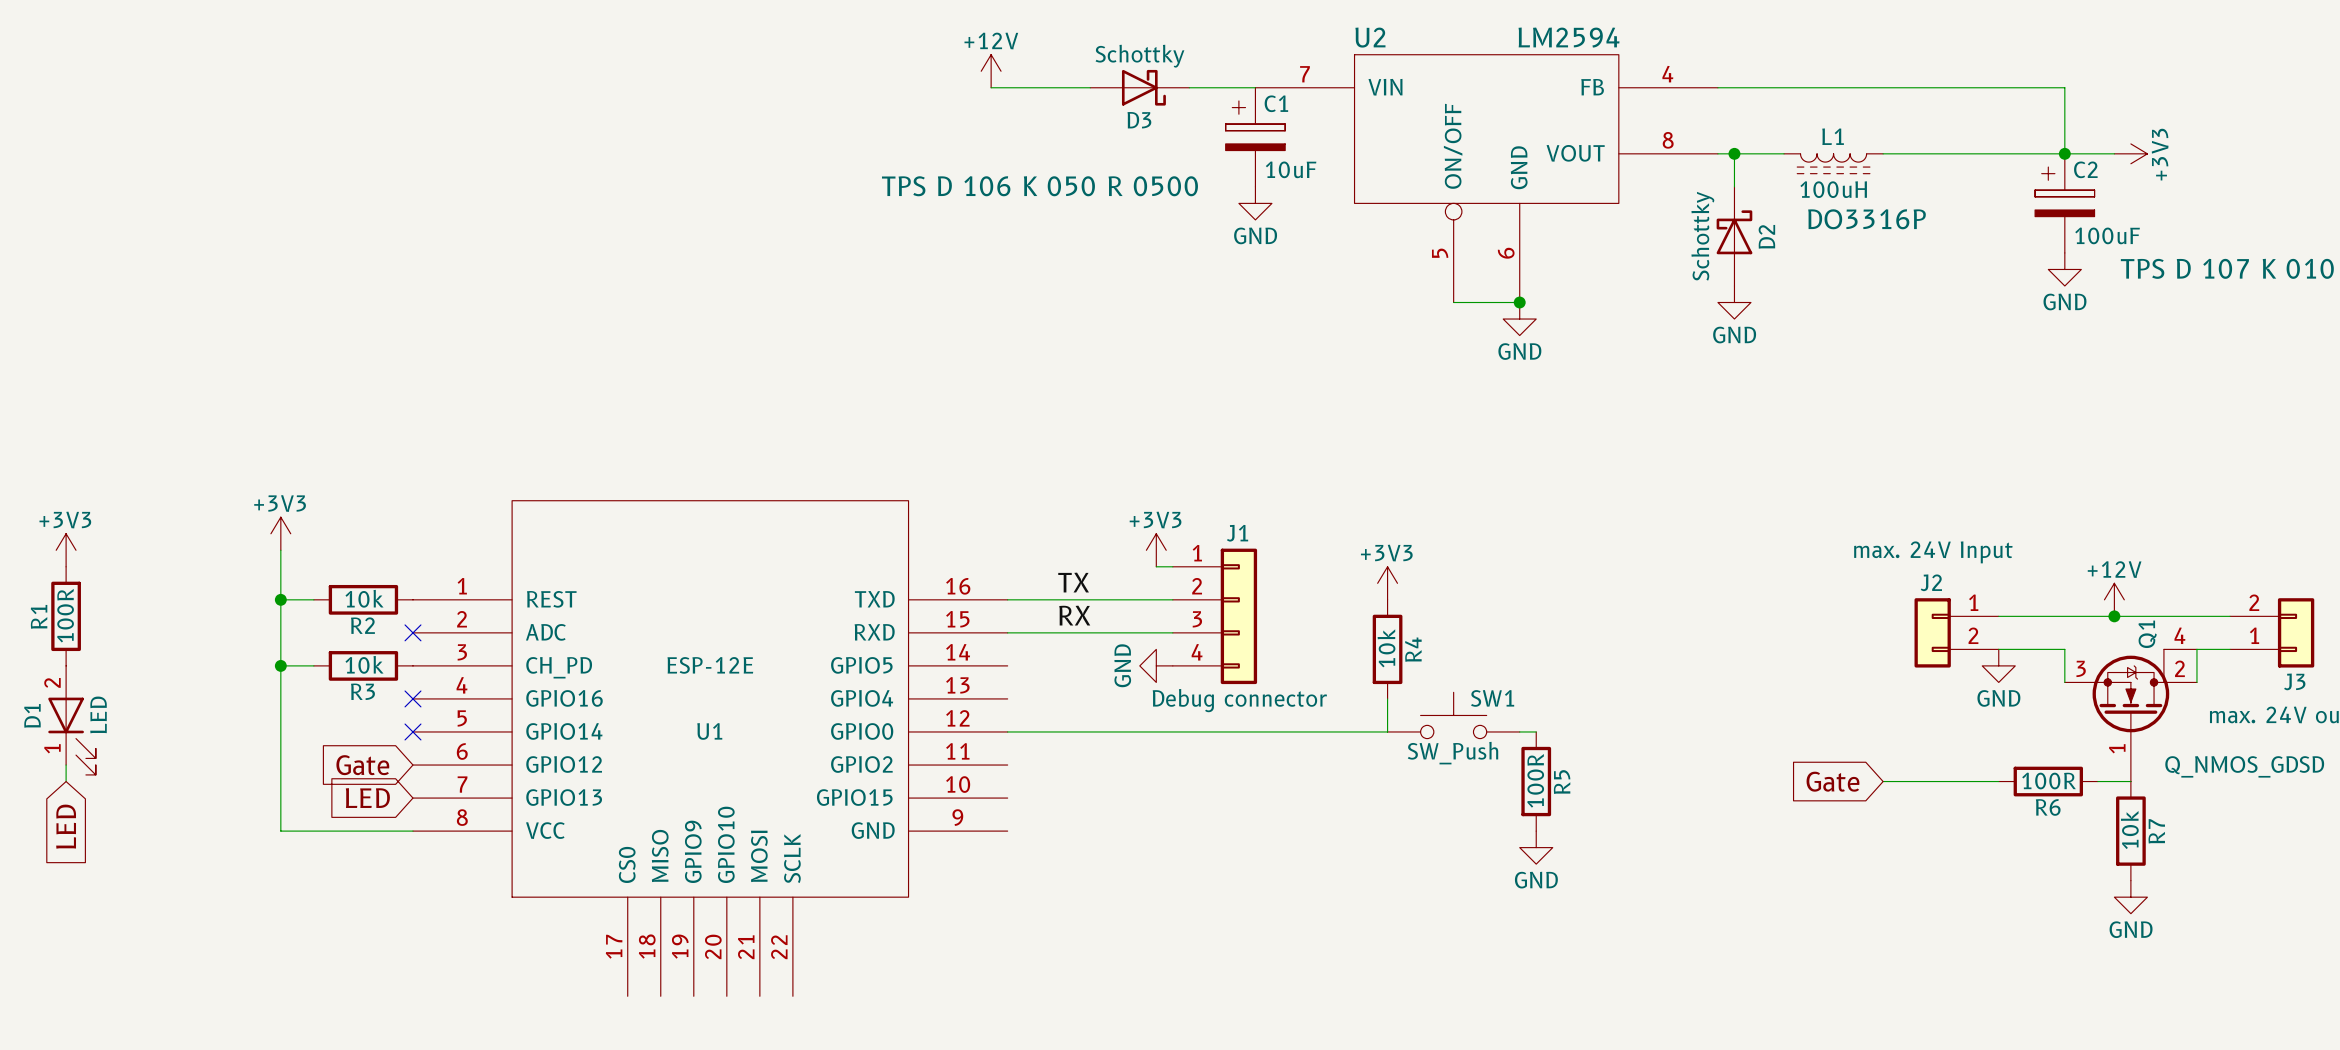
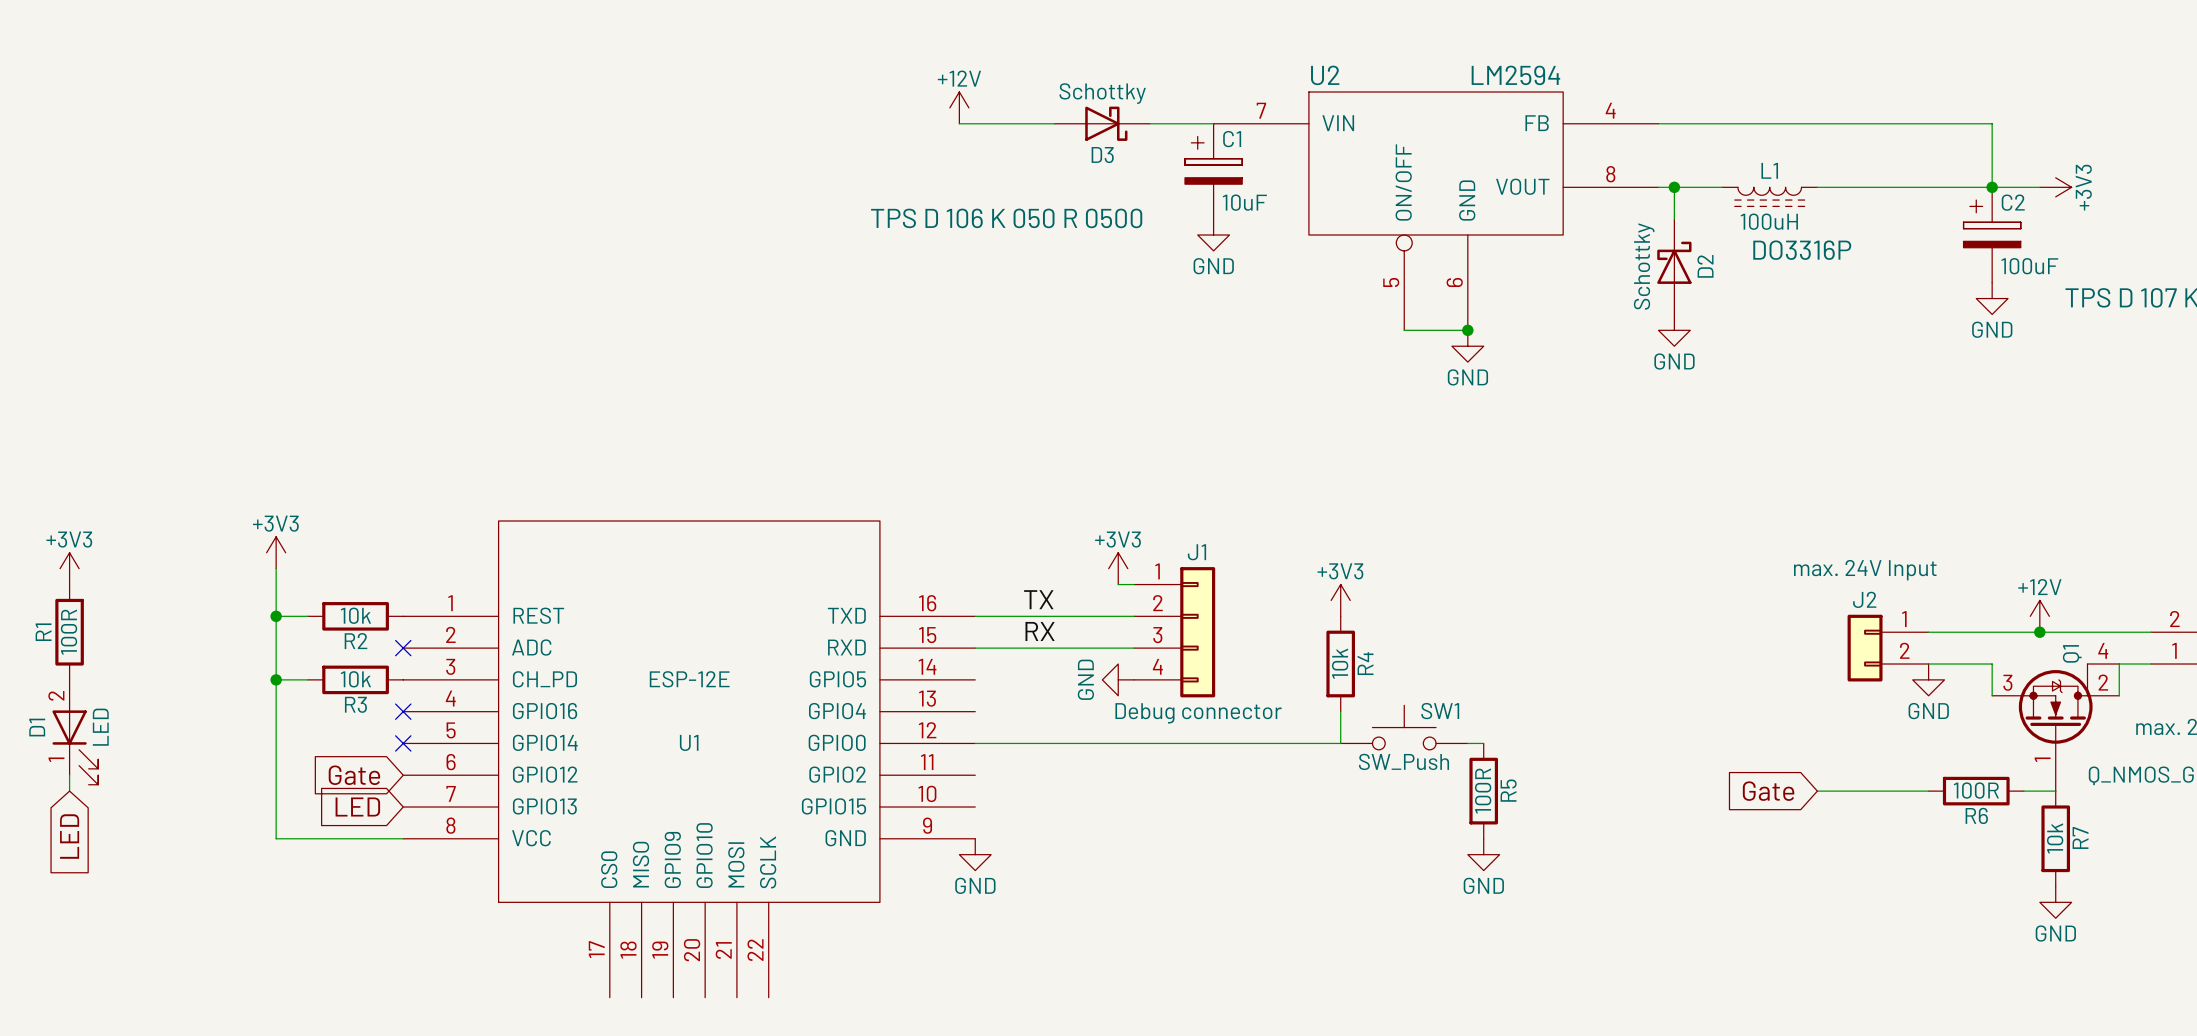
power symbol: none -> GND (975, 854)

